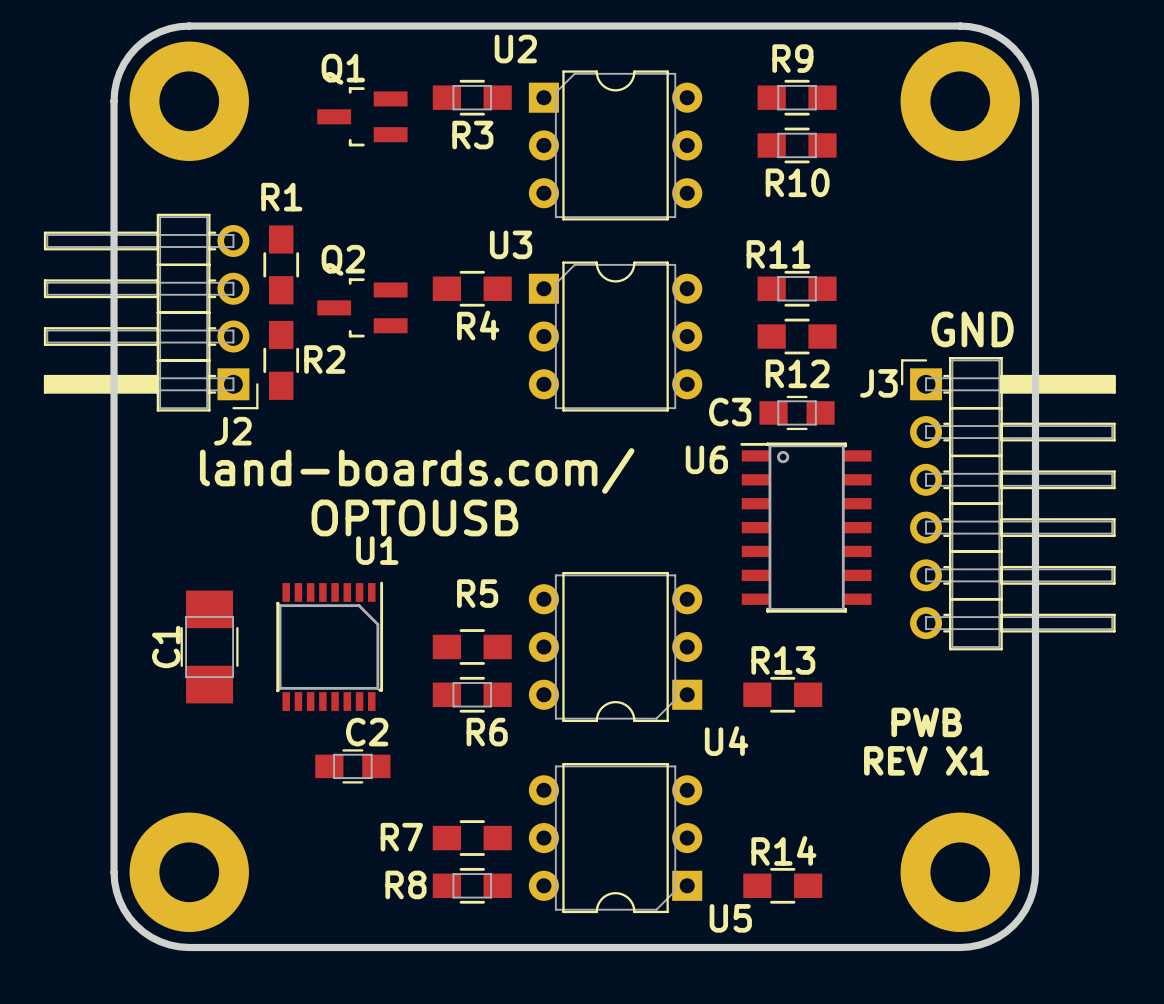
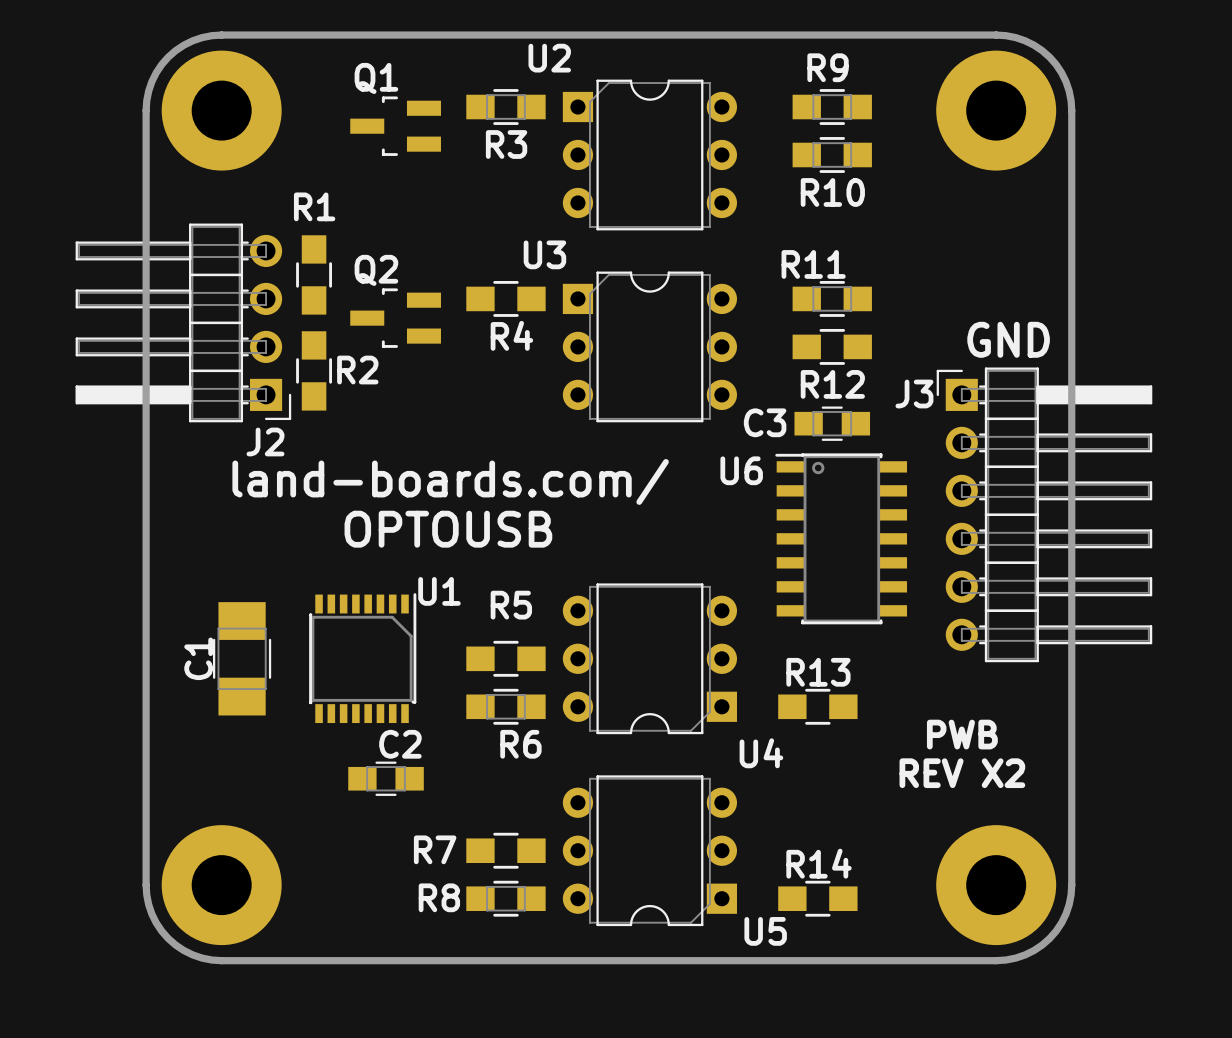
U1 name position: U1 (377, 550) -> U1 (439, 591)
text: REV X1 (926, 760) -> REV X2 (962, 773)

